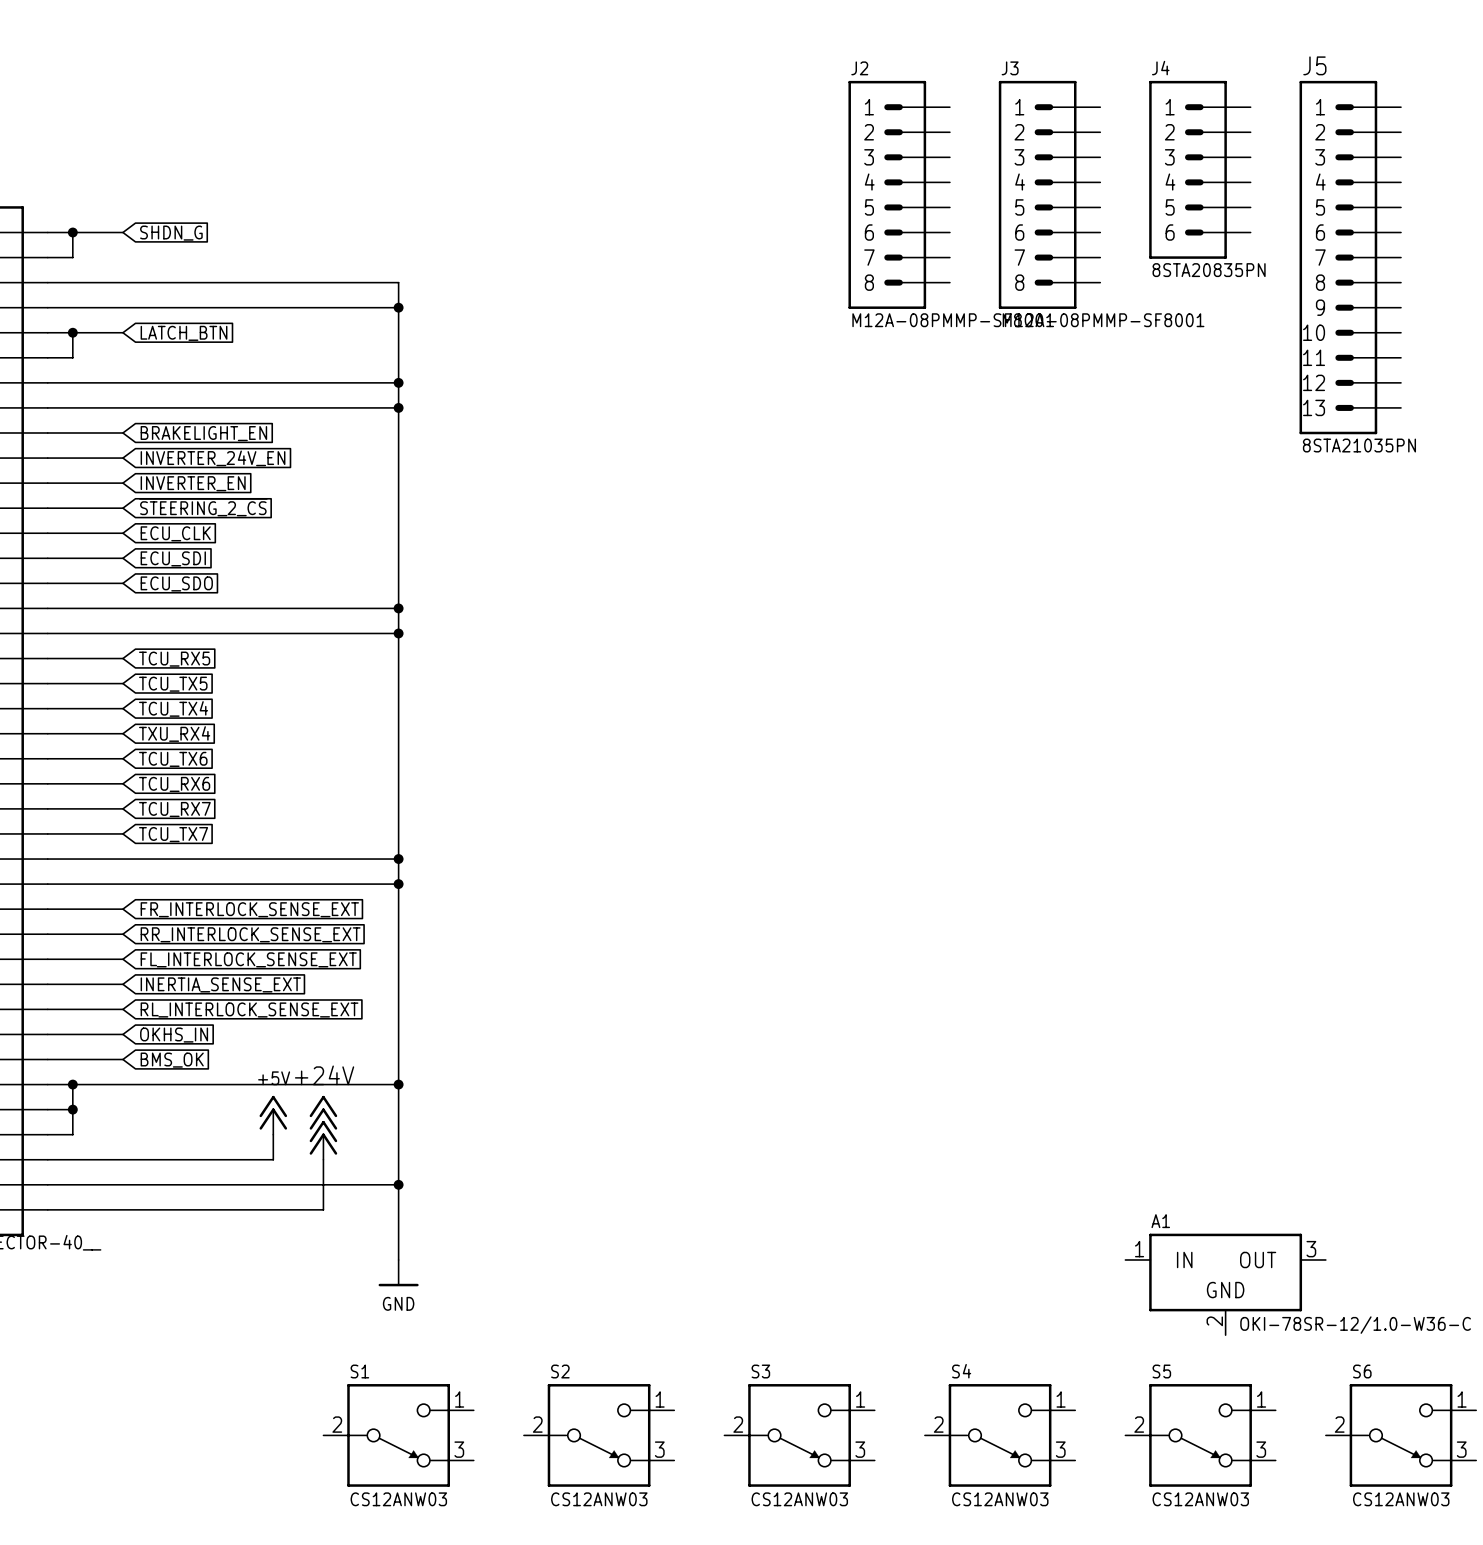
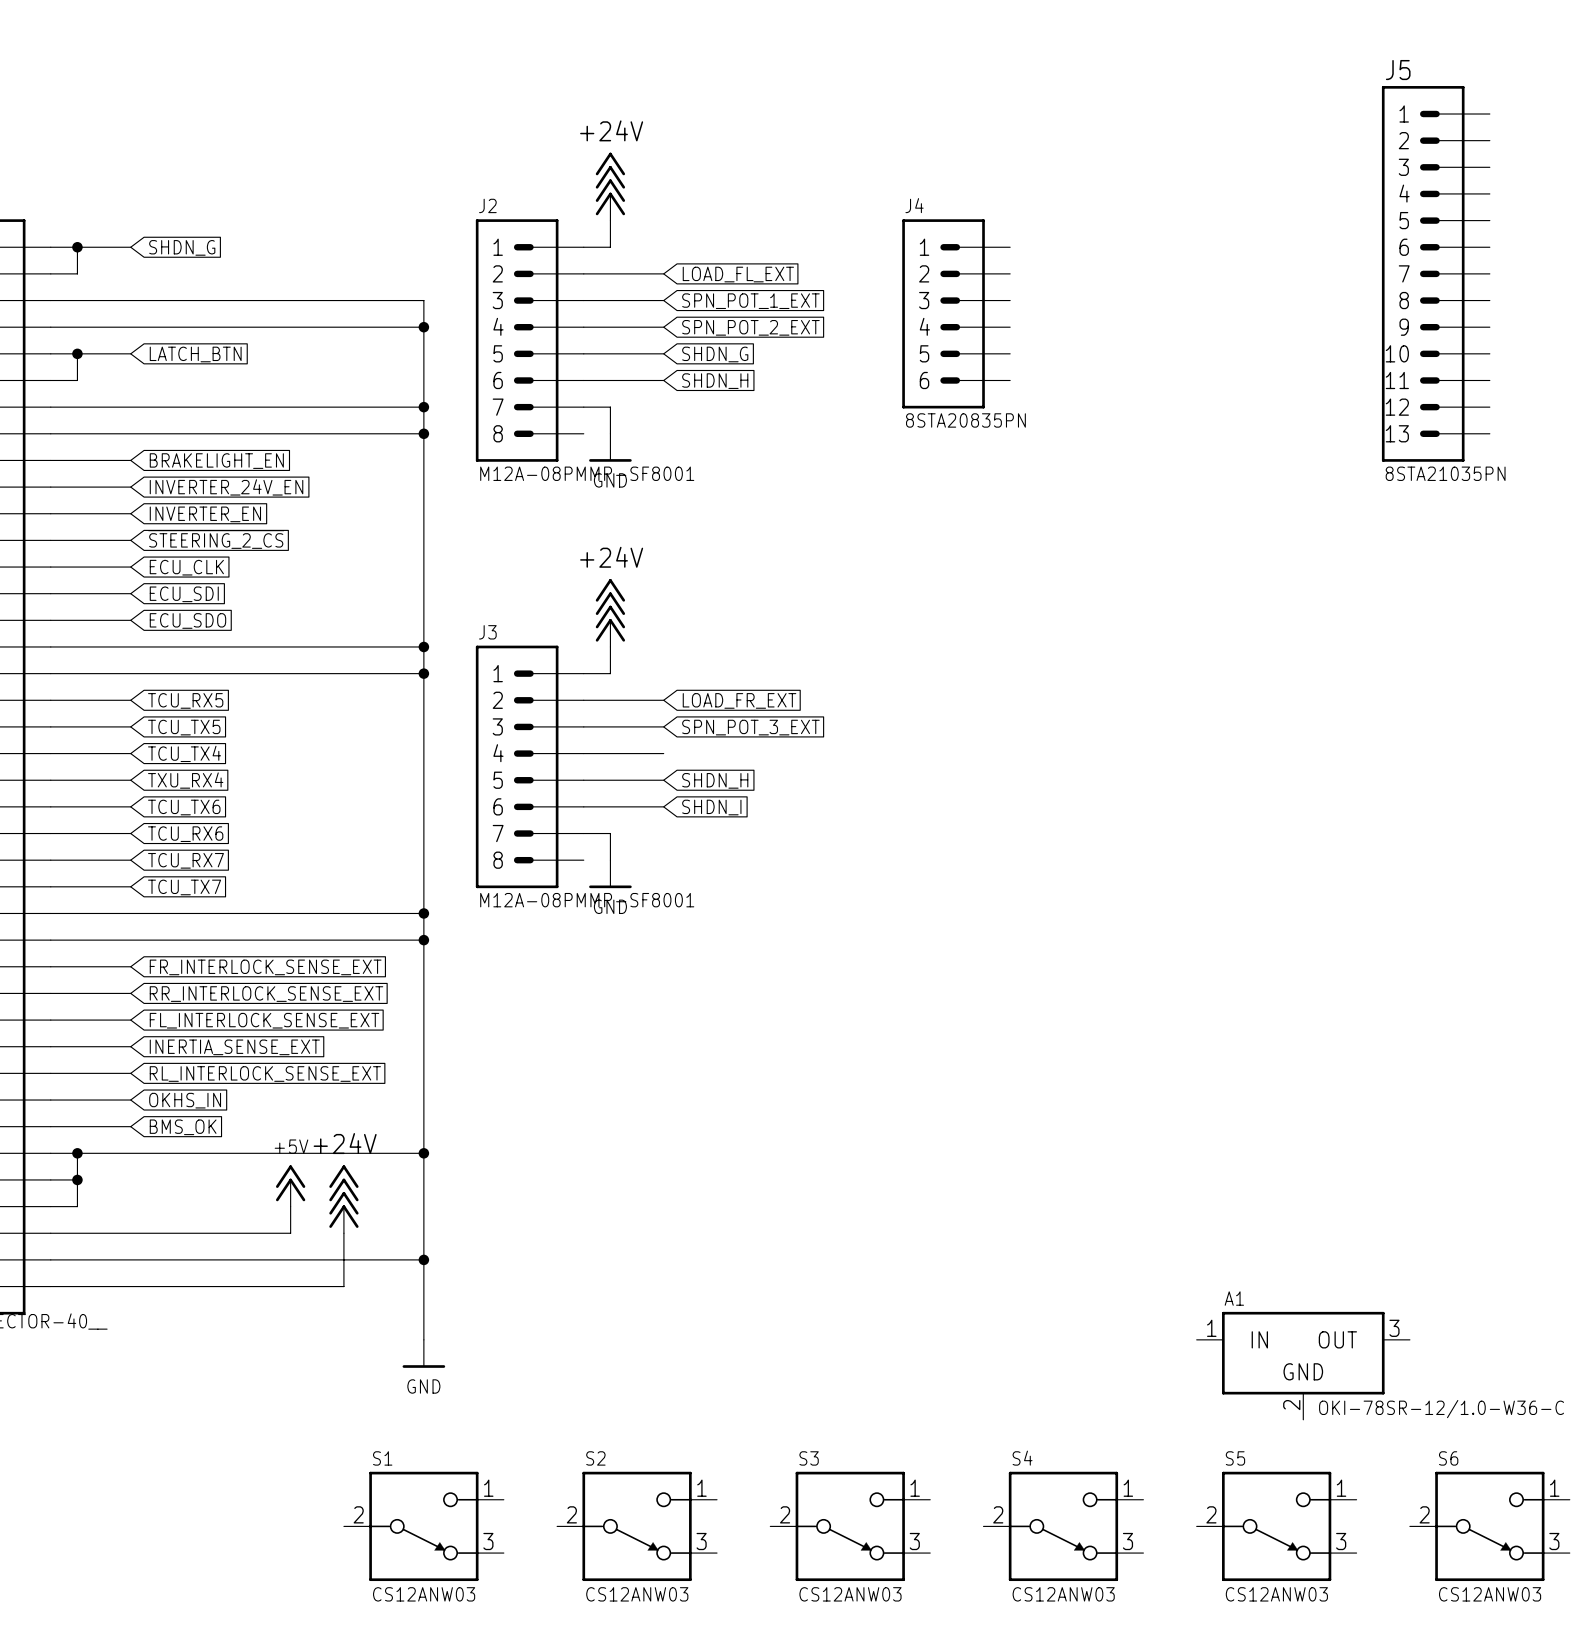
J4 position: (1199, 169) -> (956, 313)
power symbol: none -> +24V (610, 186)
J2 position: (899, 194) -> (529, 340)
J3 position: (1049, 194) -> (529, 766)
wire: none -> (610, 220) (610, 247) (583, 247)
wire: none -> (583, 273) (663, 273)
global label: none -> LOAD_FL_EXT (738, 274)
wire: none -> (583, 300) (663, 300)
global label: none -> SPN_POT_1_EXT (750, 301)
wire: none -> (583, 327) (663, 327)
global label: none -> SPN_POT_2_EXT (750, 327)
wire: none -> (583, 353) (663, 353)
global label: none -> SHDN_G (715, 354)
wire: none -> (583, 380) (663, 380)
global label: none -> SHDN_H (715, 381)
wire: none -> (583, 407) (610, 407) (610, 433)
power symbol: none -> GND (610, 447)
power symbol: none -> +24V (610, 613)
wire: none -> (610, 646) (610, 673) (583, 673)
wire: none -> (583, 700) (663, 700)
global label: none -> LOAD_FR_EXT (739, 700)
wire: none -> (583, 726) (663, 726)
global label: none -> SPN_POT_3_EXT (750, 727)
wire: none -> (583, 753) (663, 753)
wire: none -> (583, 780) (663, 780)
global label: none -> SHDN_H (715, 780)
wire: none -> (583, 806) (663, 806)
global label: none -> SHDN_I (711, 807)
wire: none -> (583, 833) (610, 833) (610, 860)
power symbol: none -> GND (610, 874)

